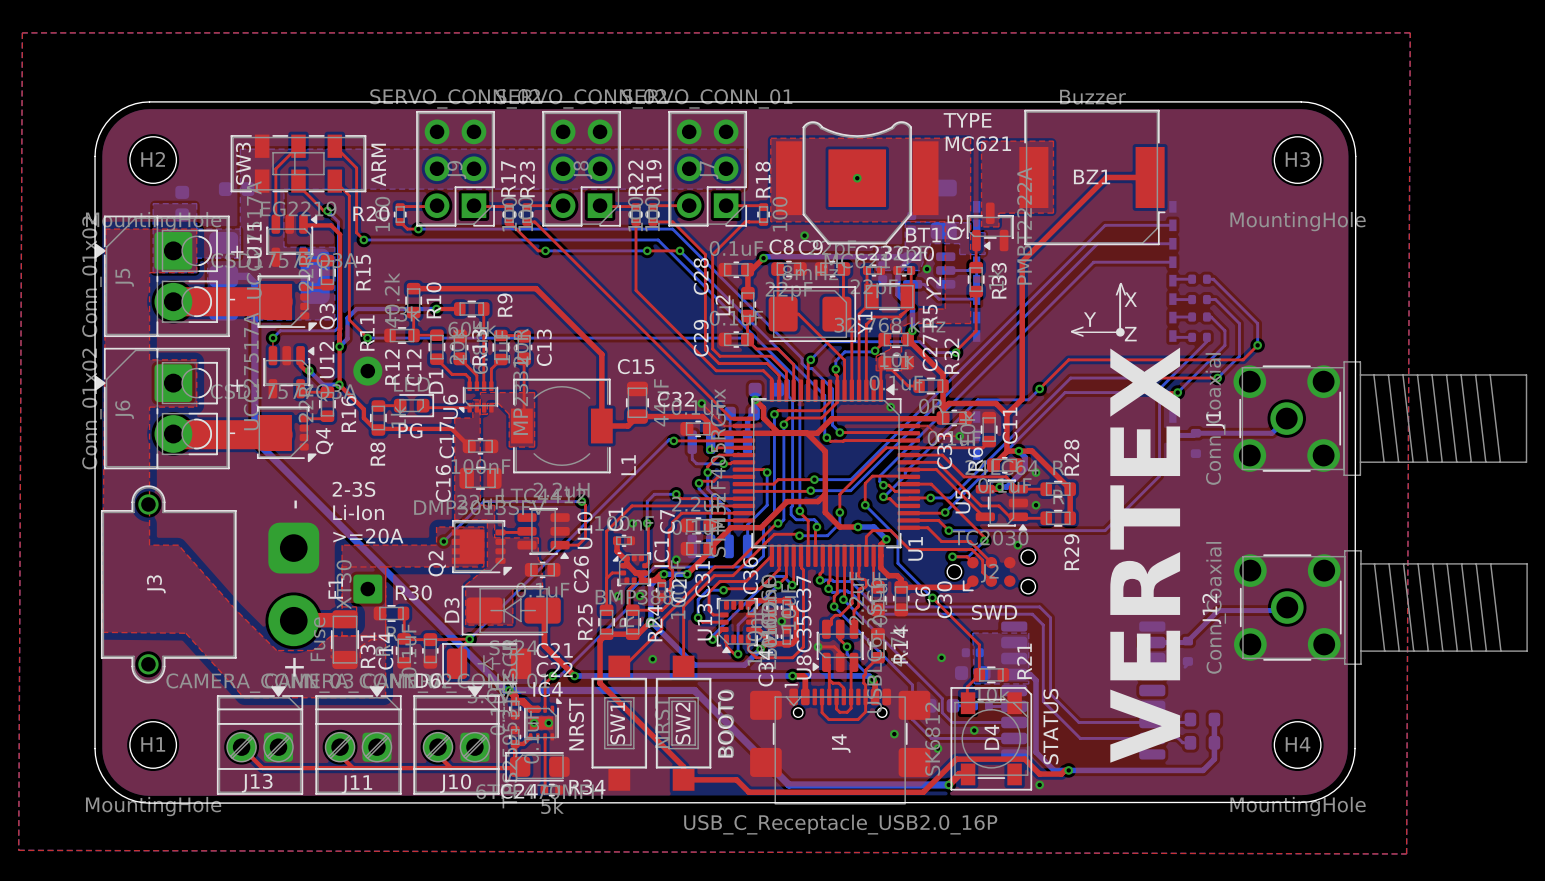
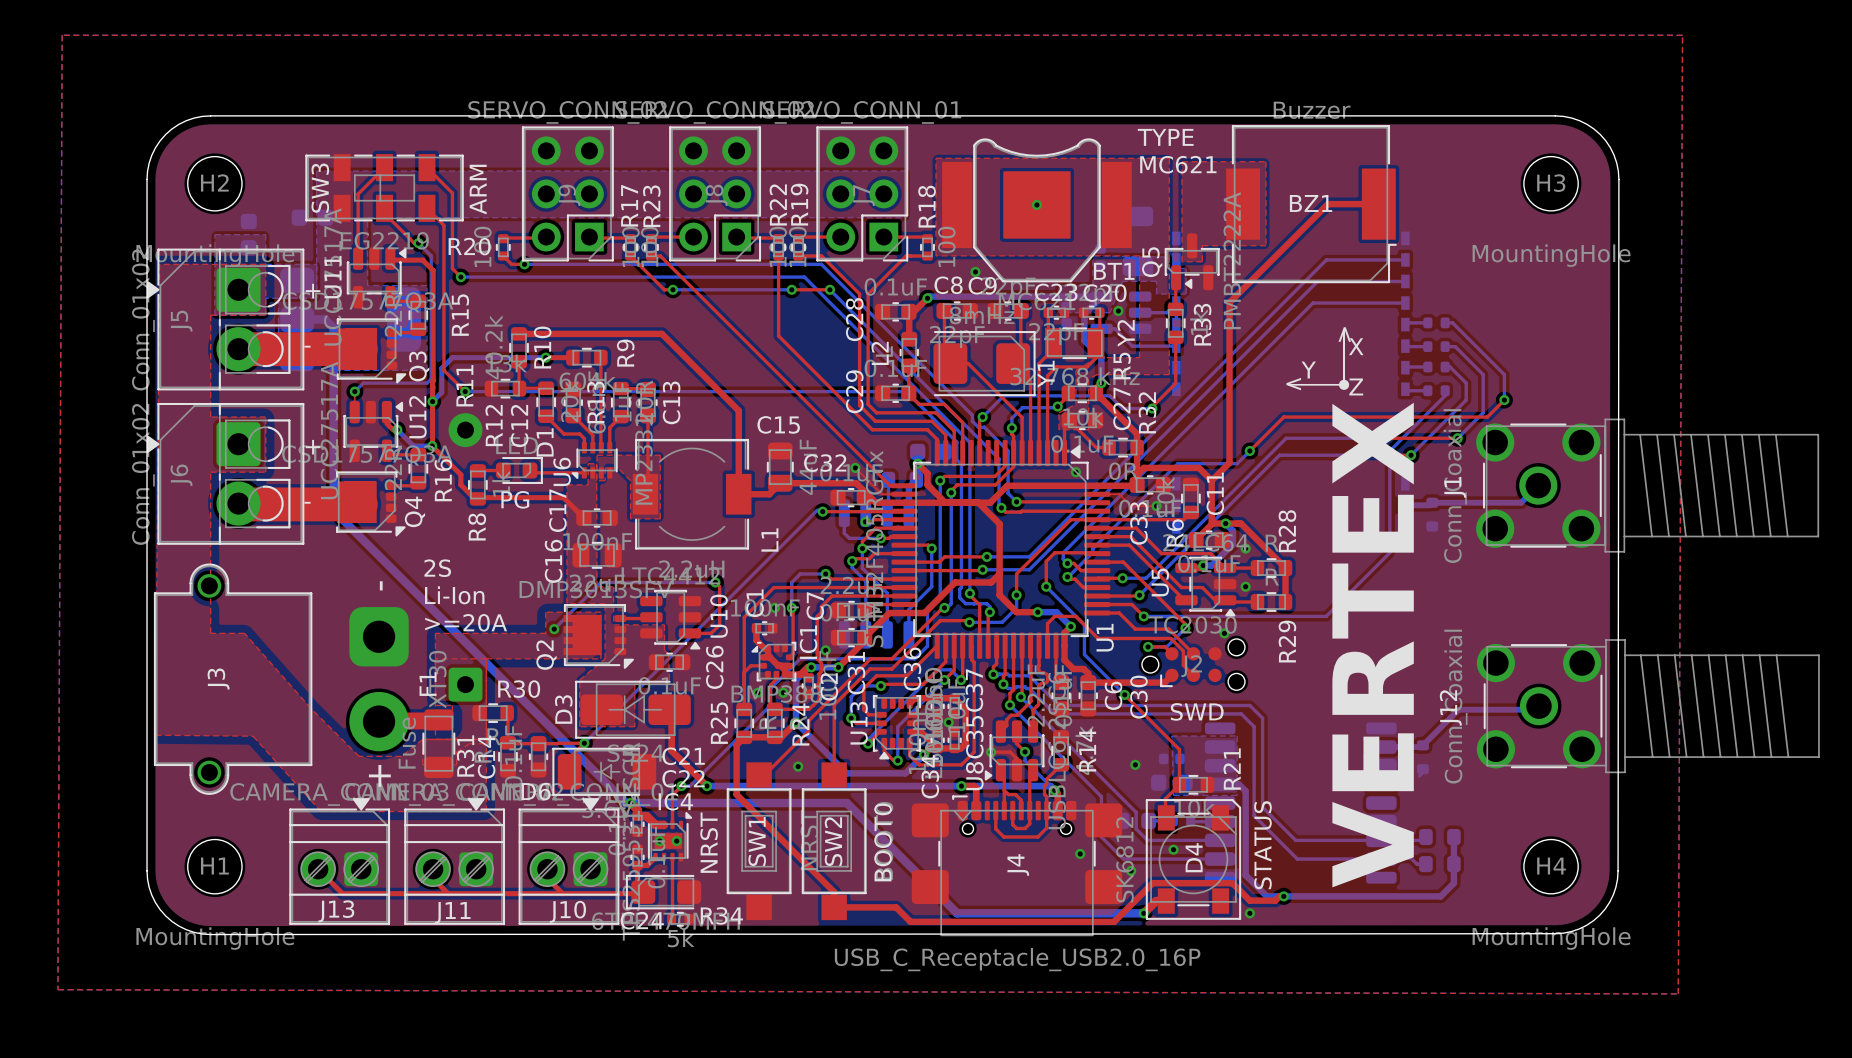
text: 2-3S (353, 489) -> 2S (437, 568)

